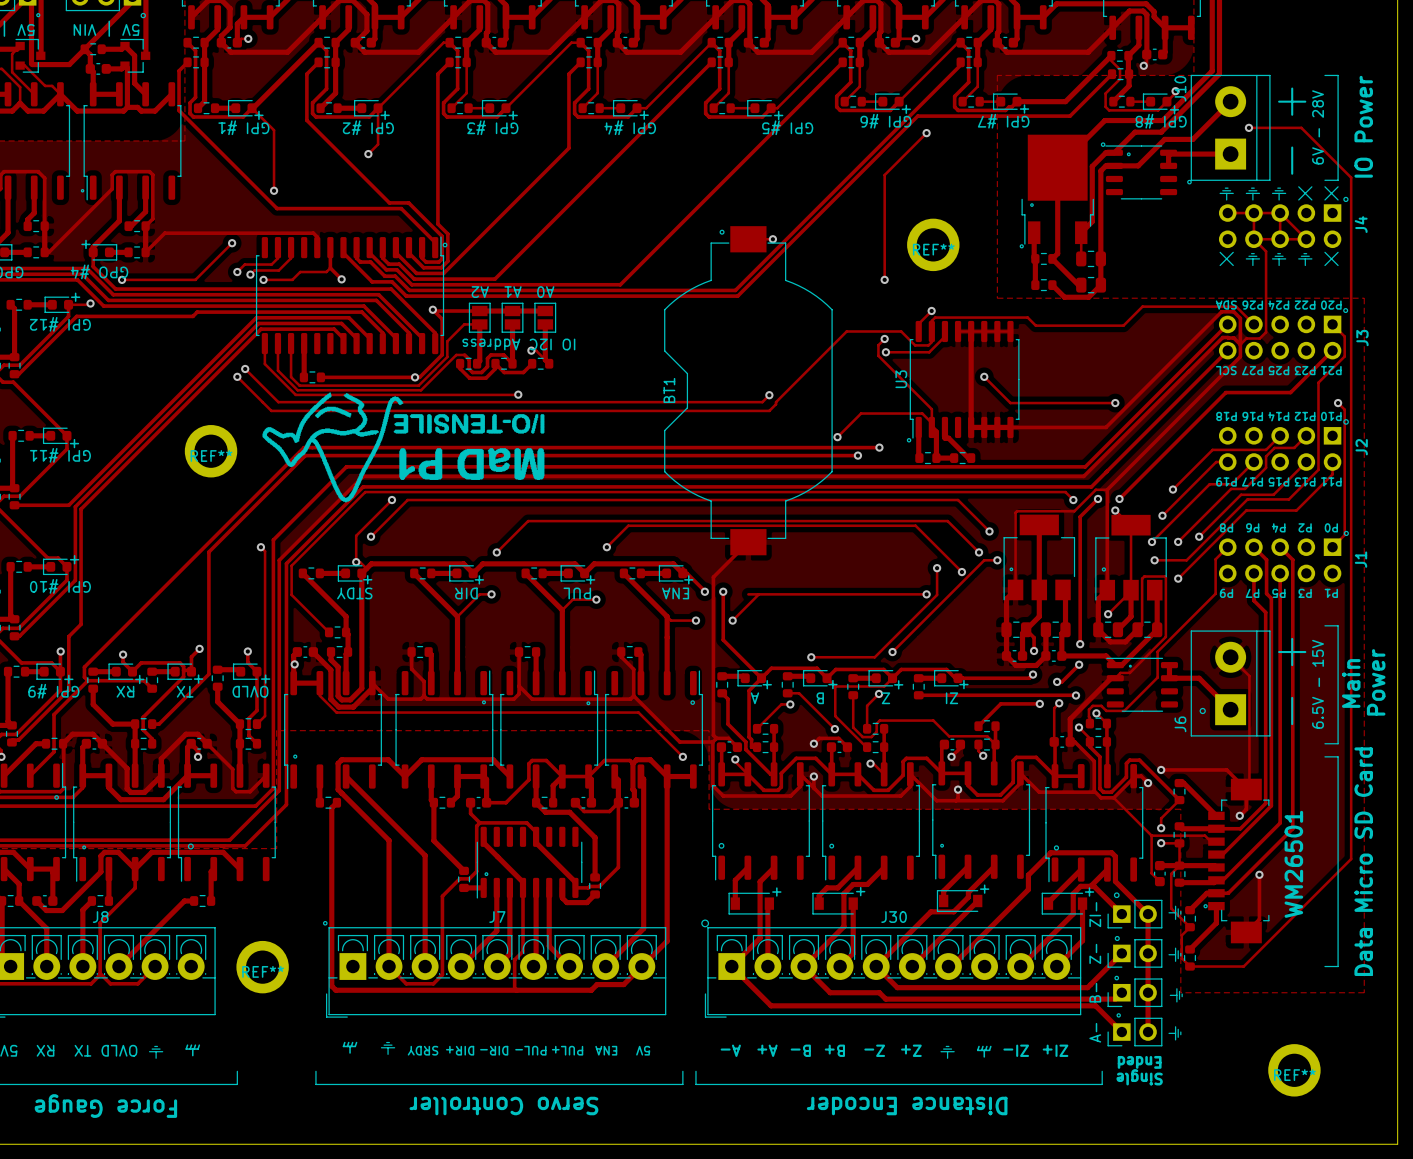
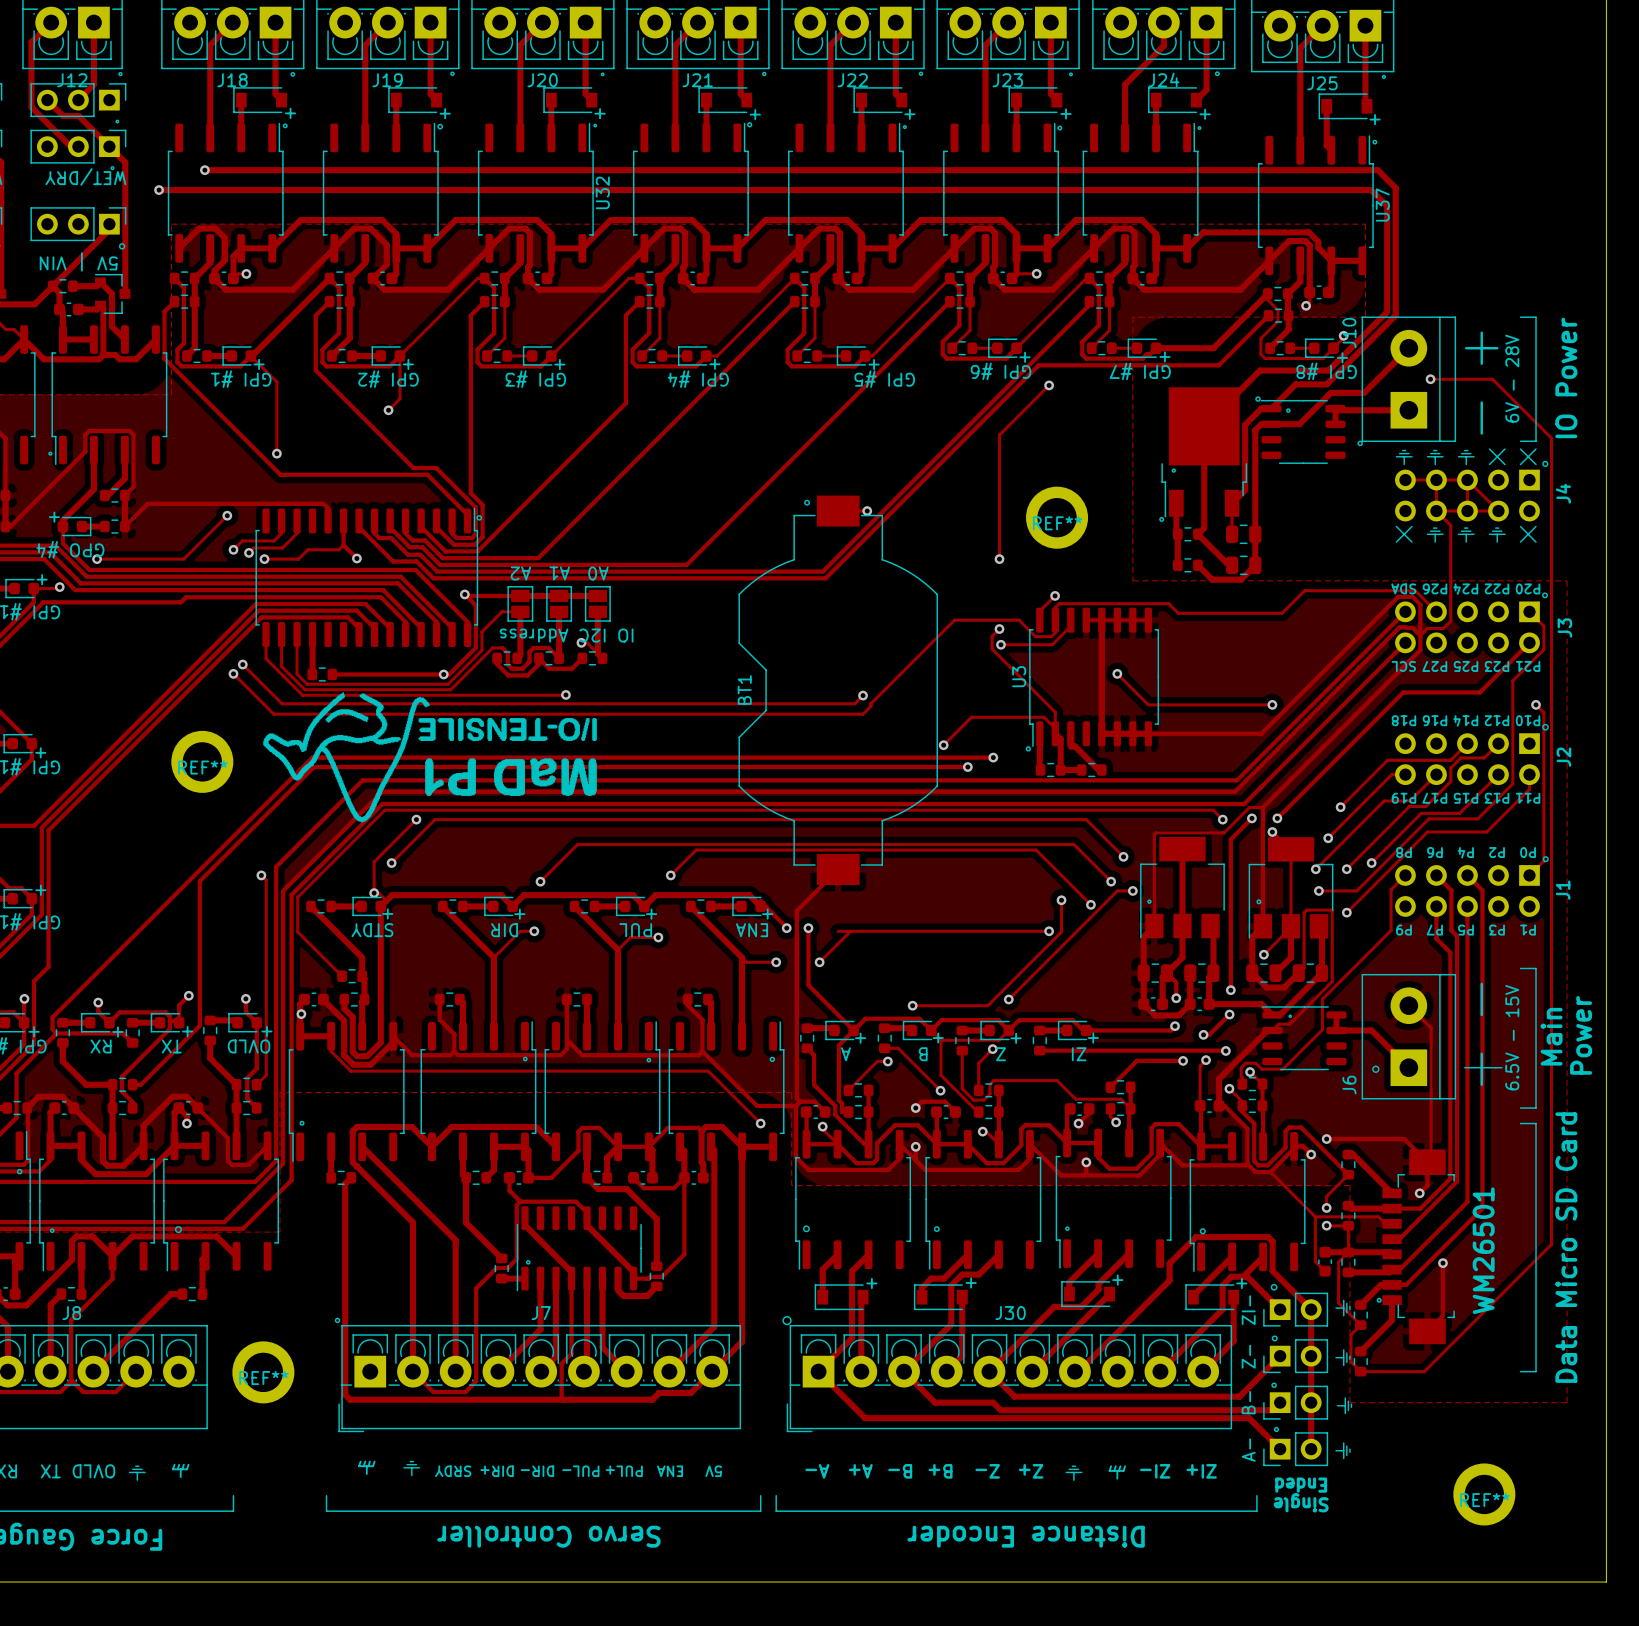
line: (1279, 652) (1305, 652) -> none
line: none -> (1464, 1067) (1501, 1067)

